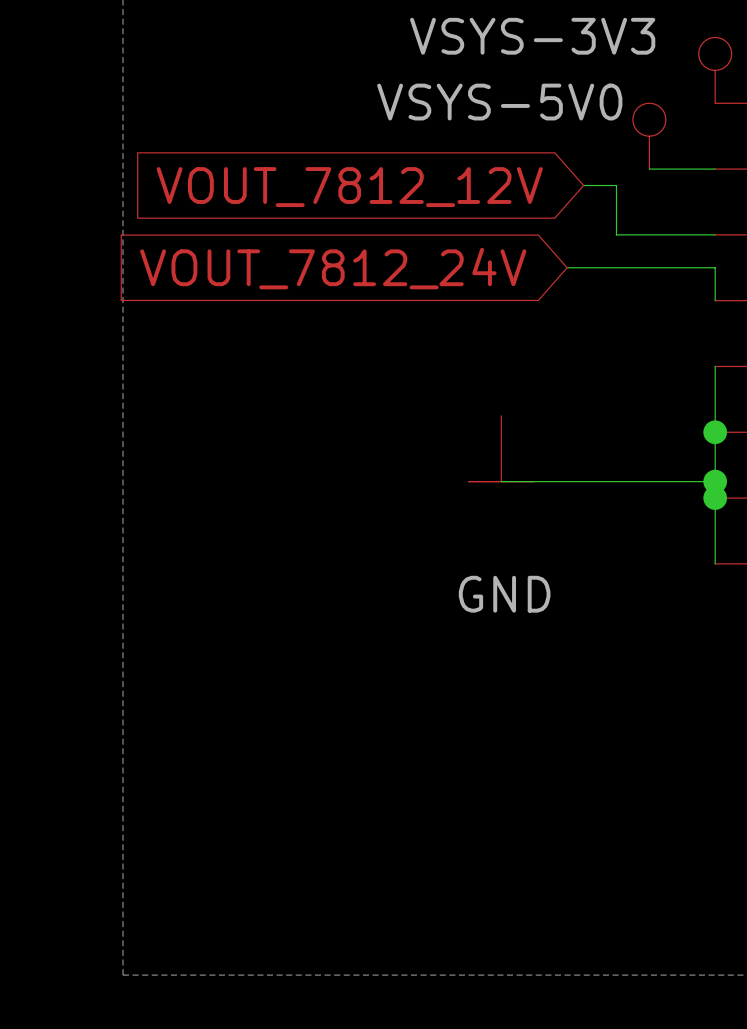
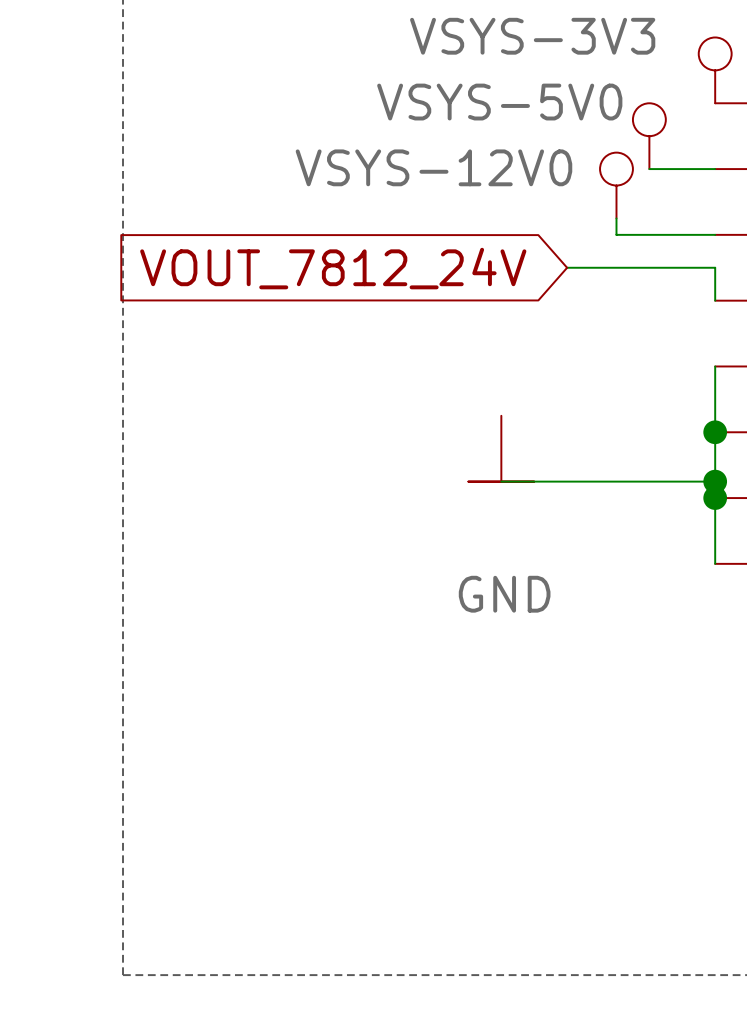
wire: (583, 185) (616, 185) (616, 218) -> none
power symbol: none -> VSYS-12V0 (616, 185)
global label: VOUT_7812_12V (349, 187) -> none

